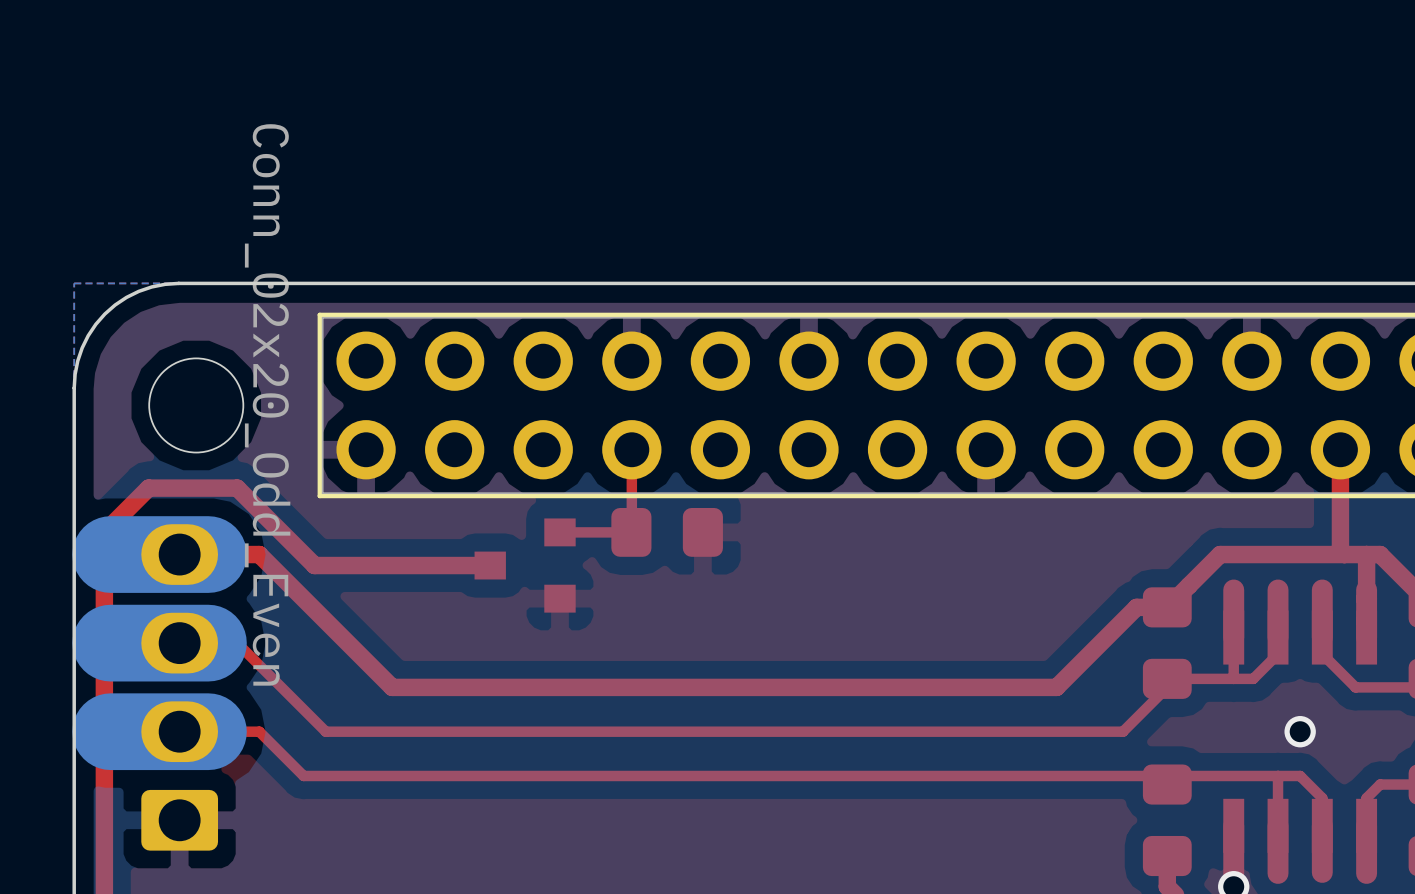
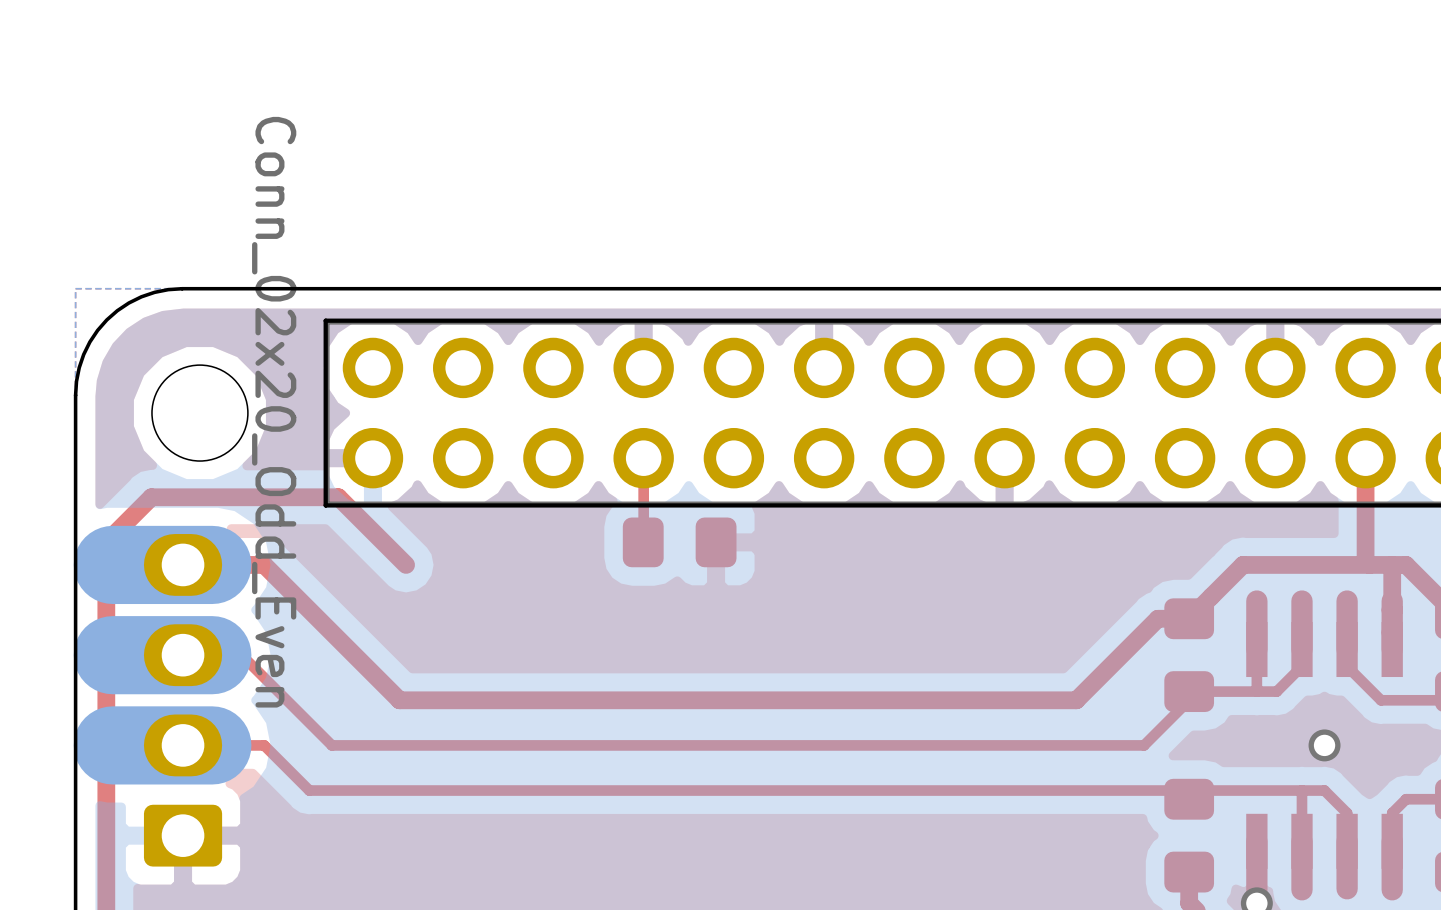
top track: (237, 488) (314, 565) (490, 565) -> (241, 497) (338, 497) (406, 564)
top track: (631, 532) (559, 532) -> none
part: (525, 565) -> none

